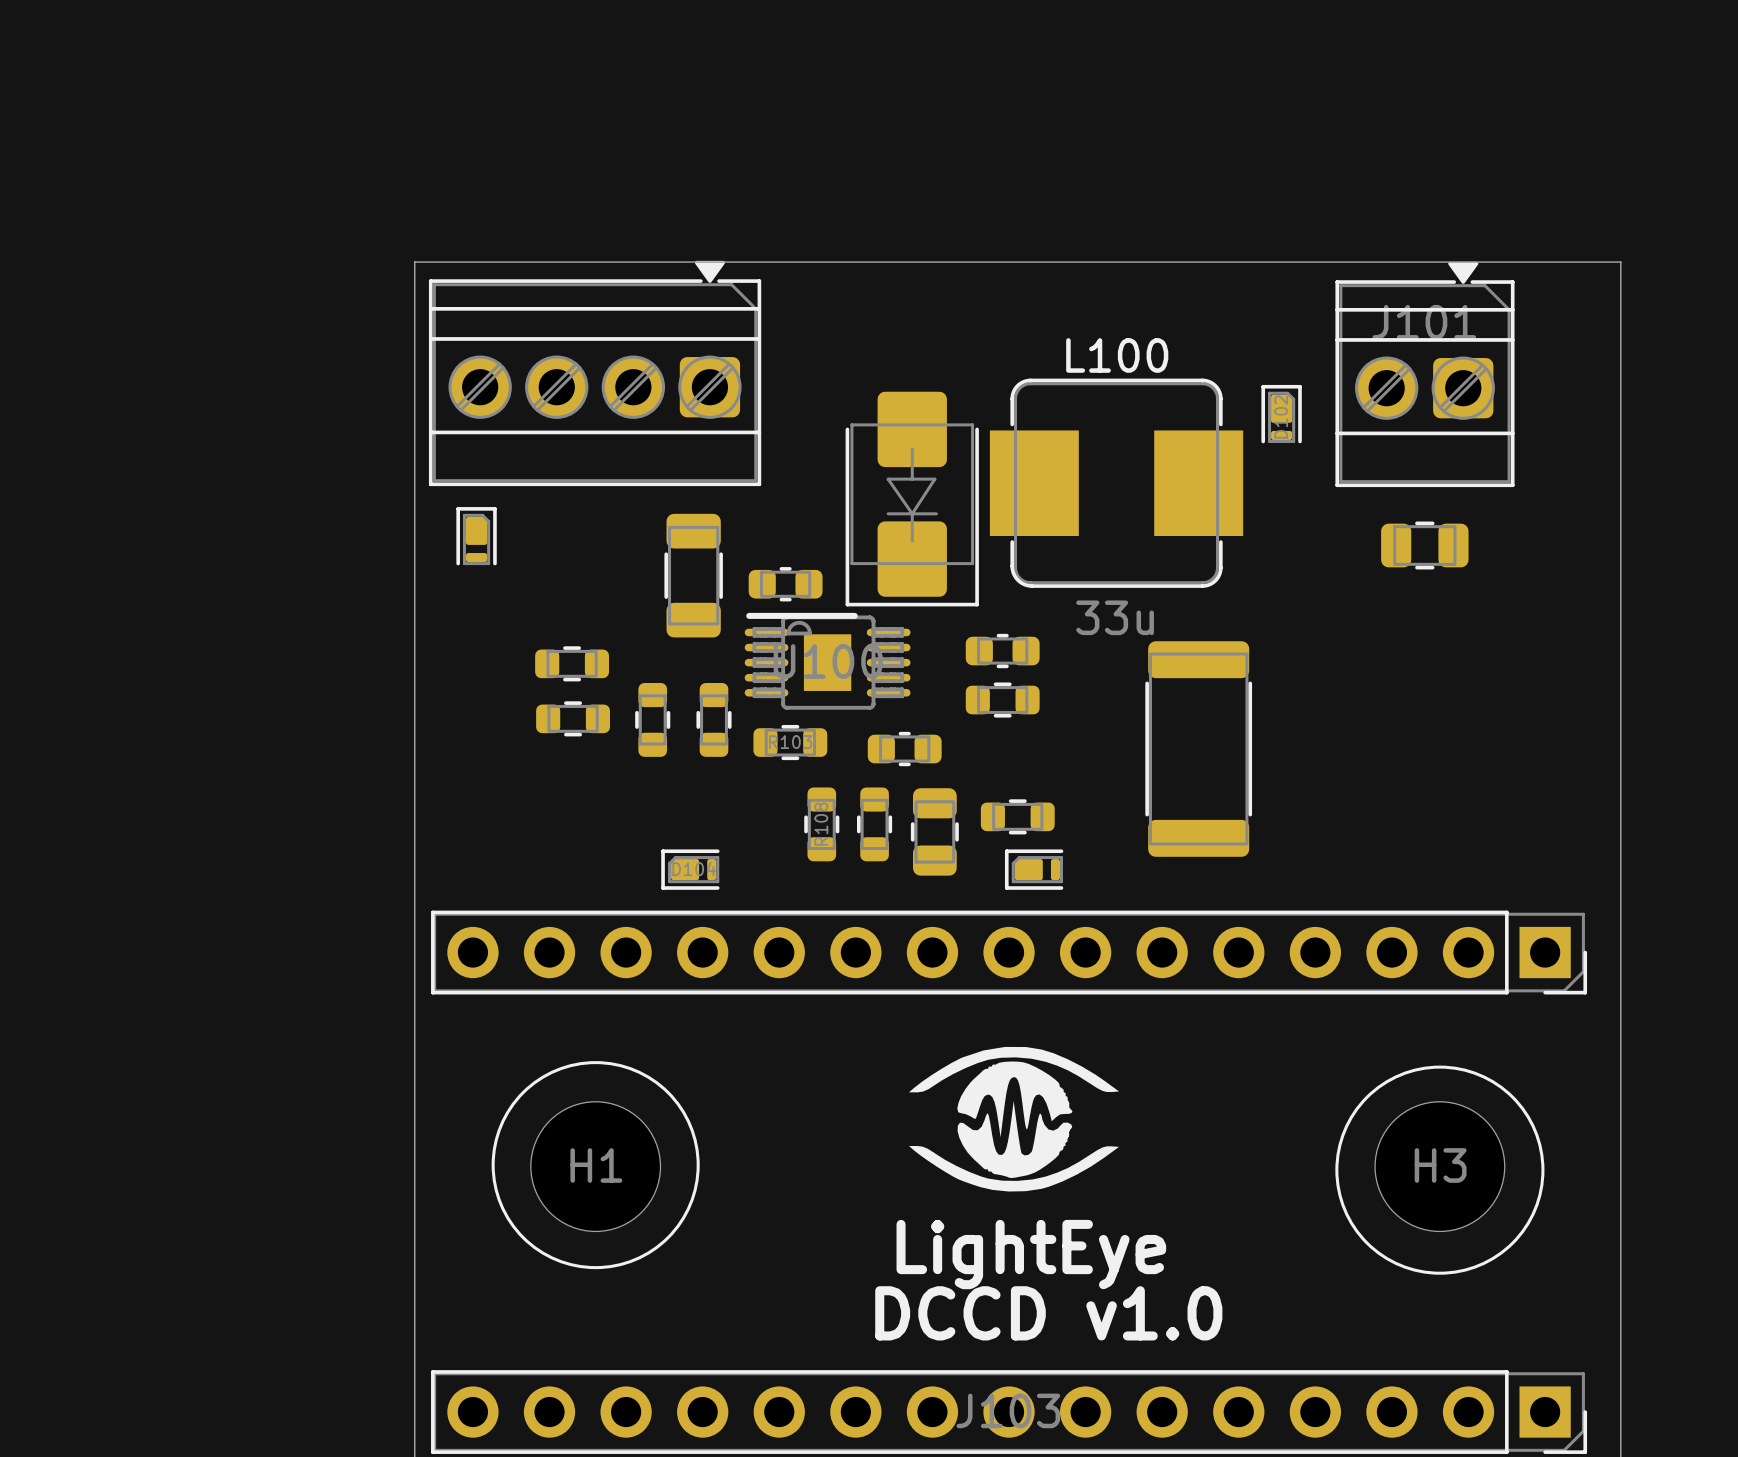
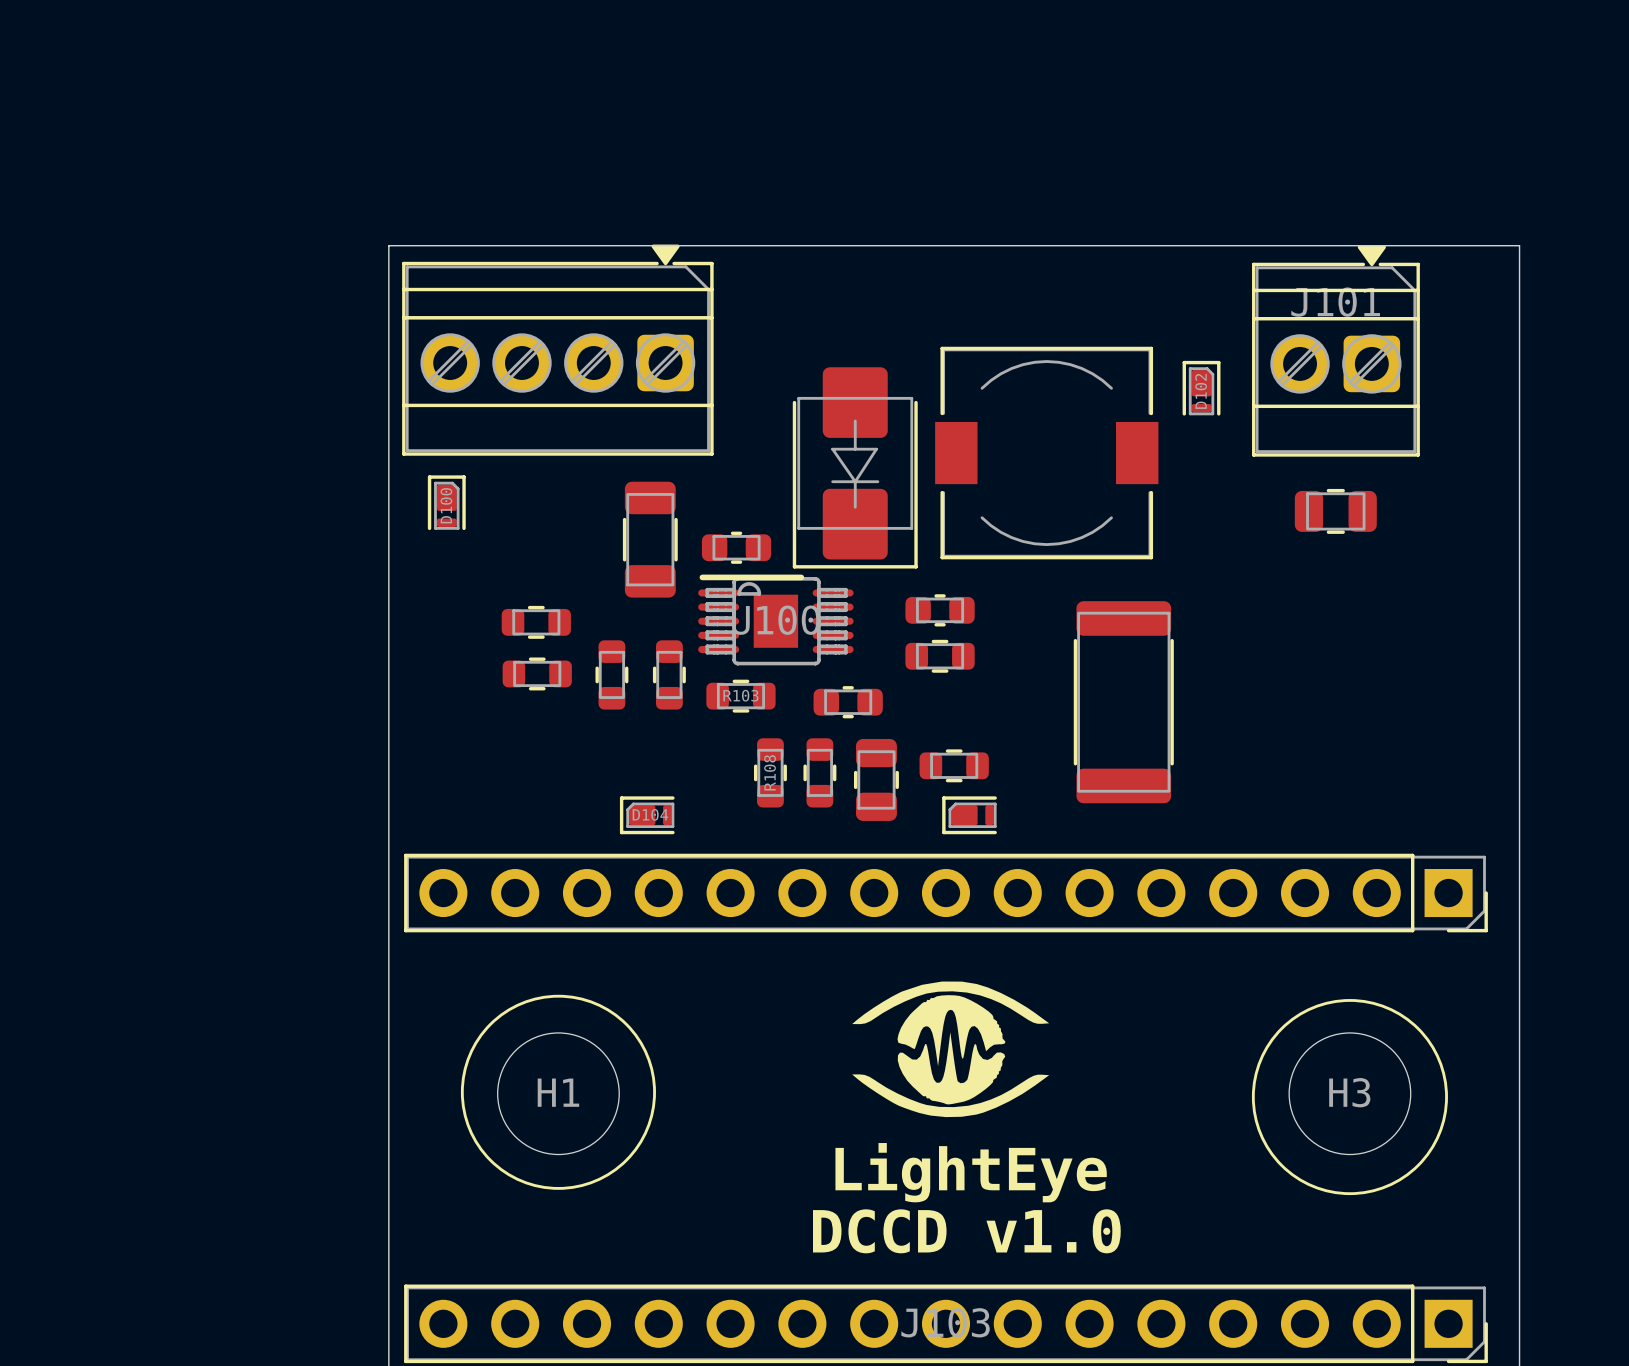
L100: 33u (1116, 483) -> none
part: none -> (1046, 453)
D100 name: none -> D100 (446, 505)

